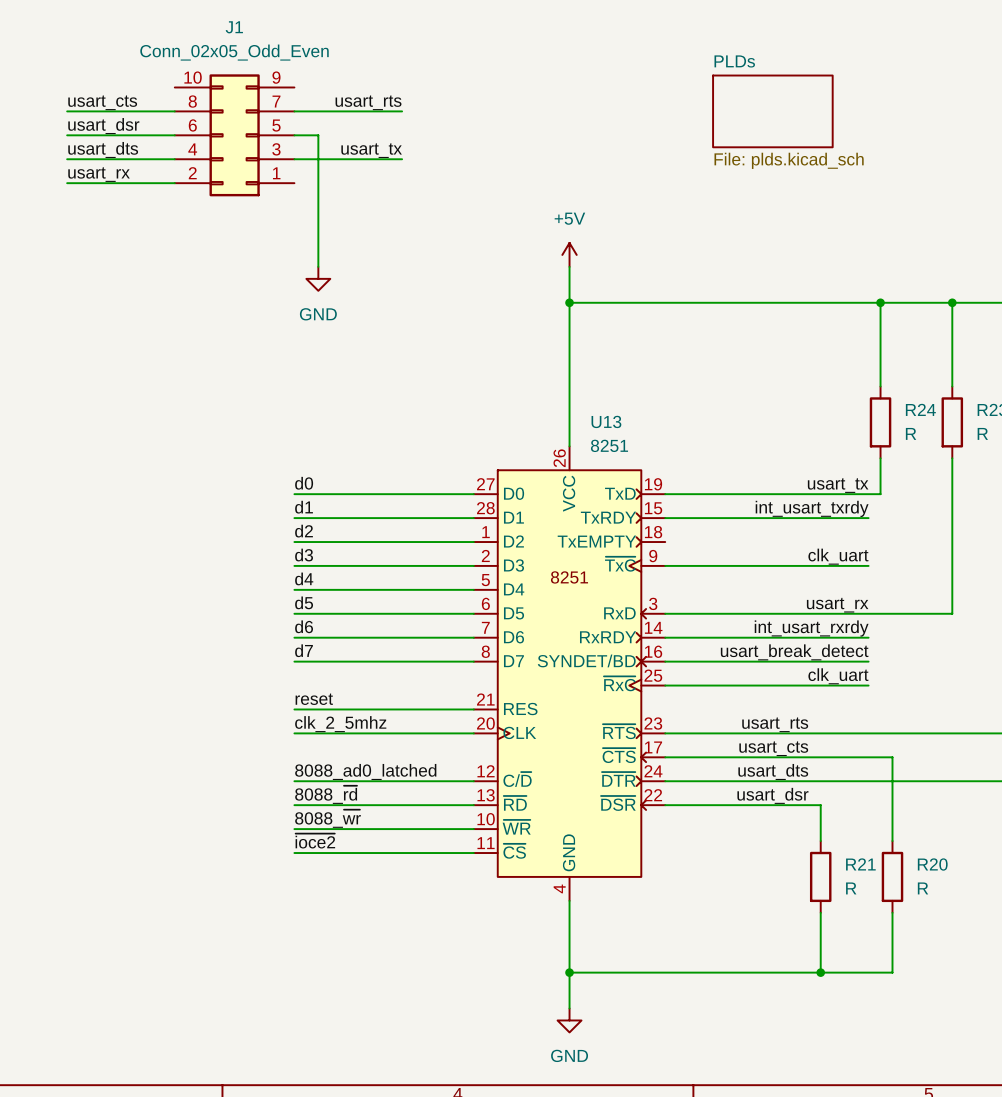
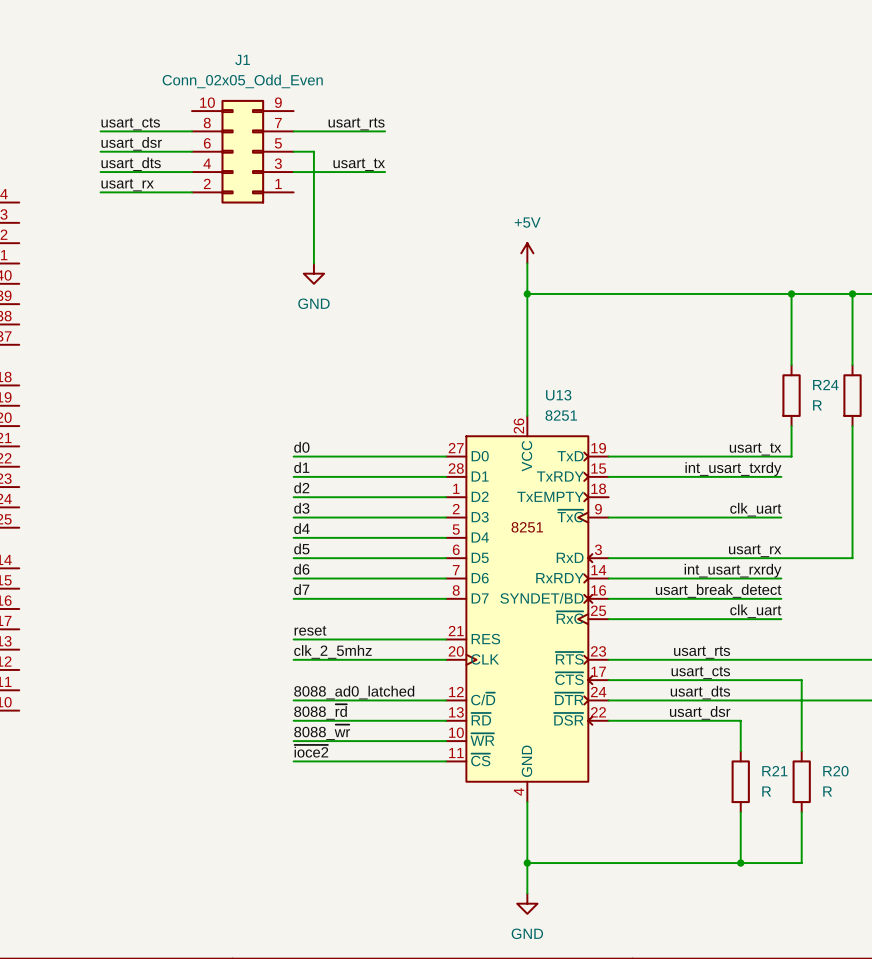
sheet PLDs: File: plds.kicad_sch (772, 111) -> none

